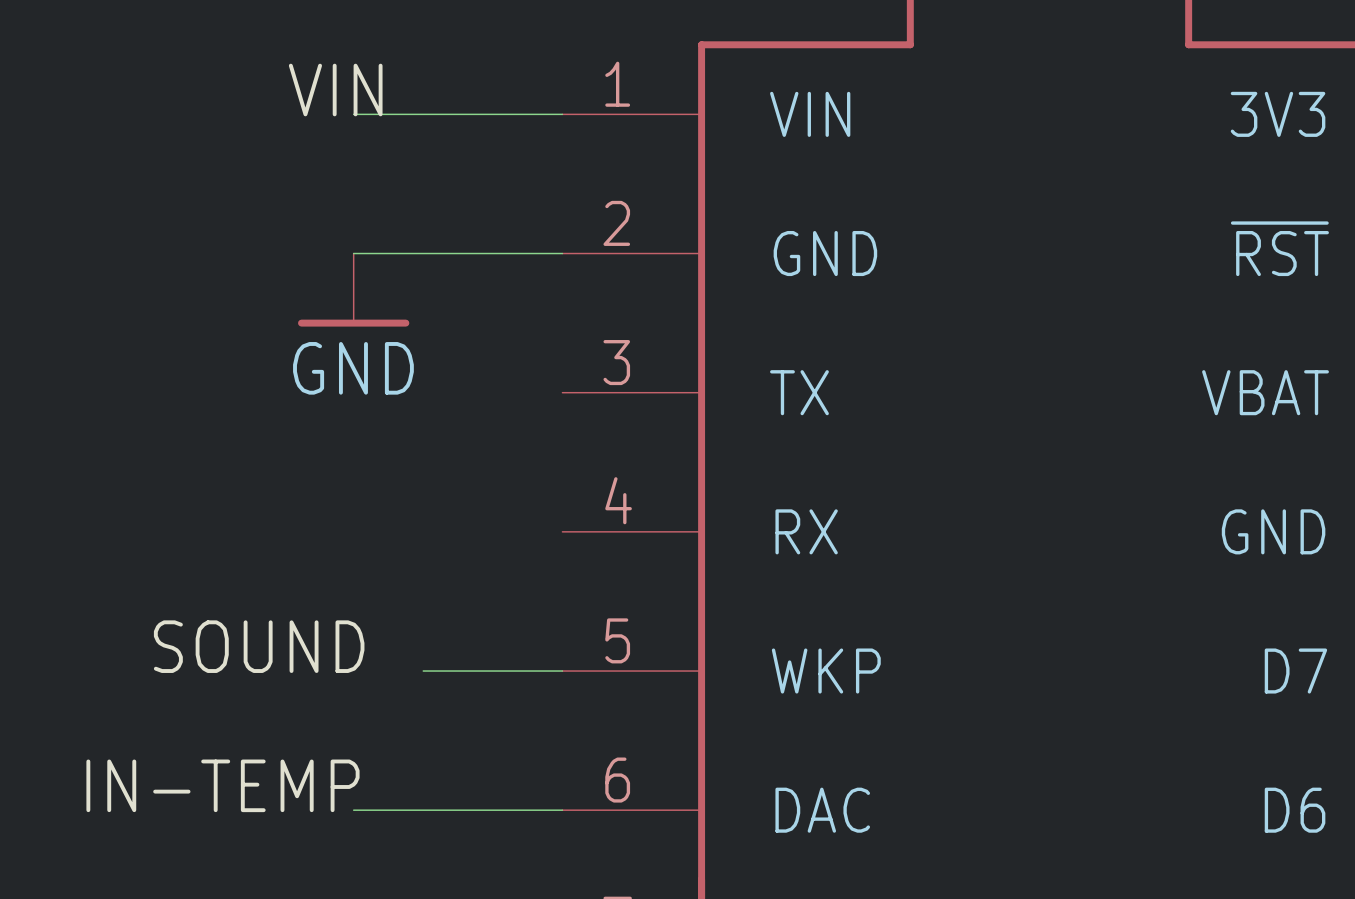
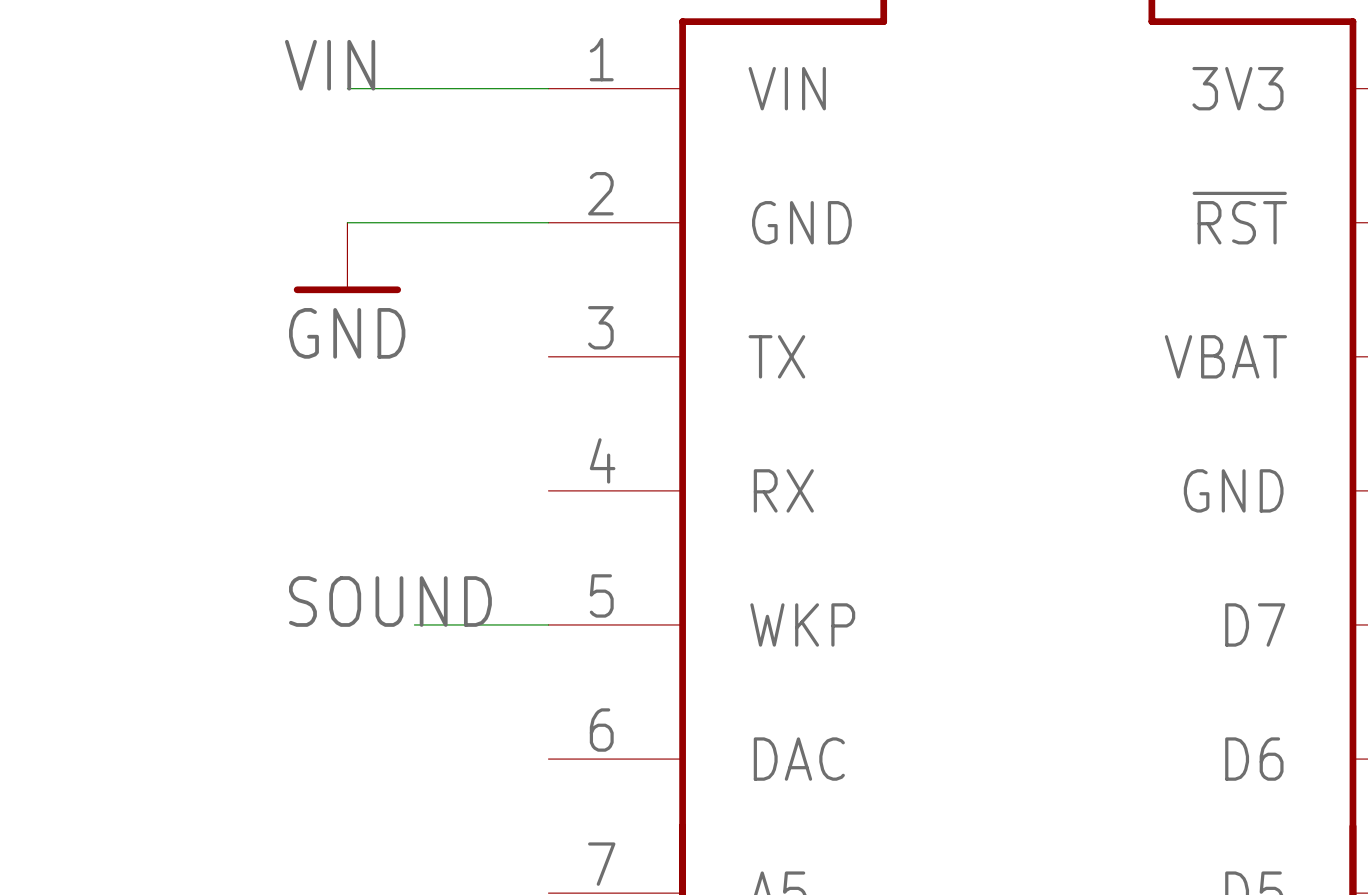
label position: SOUND (259, 646) -> SOUND (390, 601)
label: IN-TEMP (222, 785) -> none
wire: (353, 810) (562, 810) -> none

